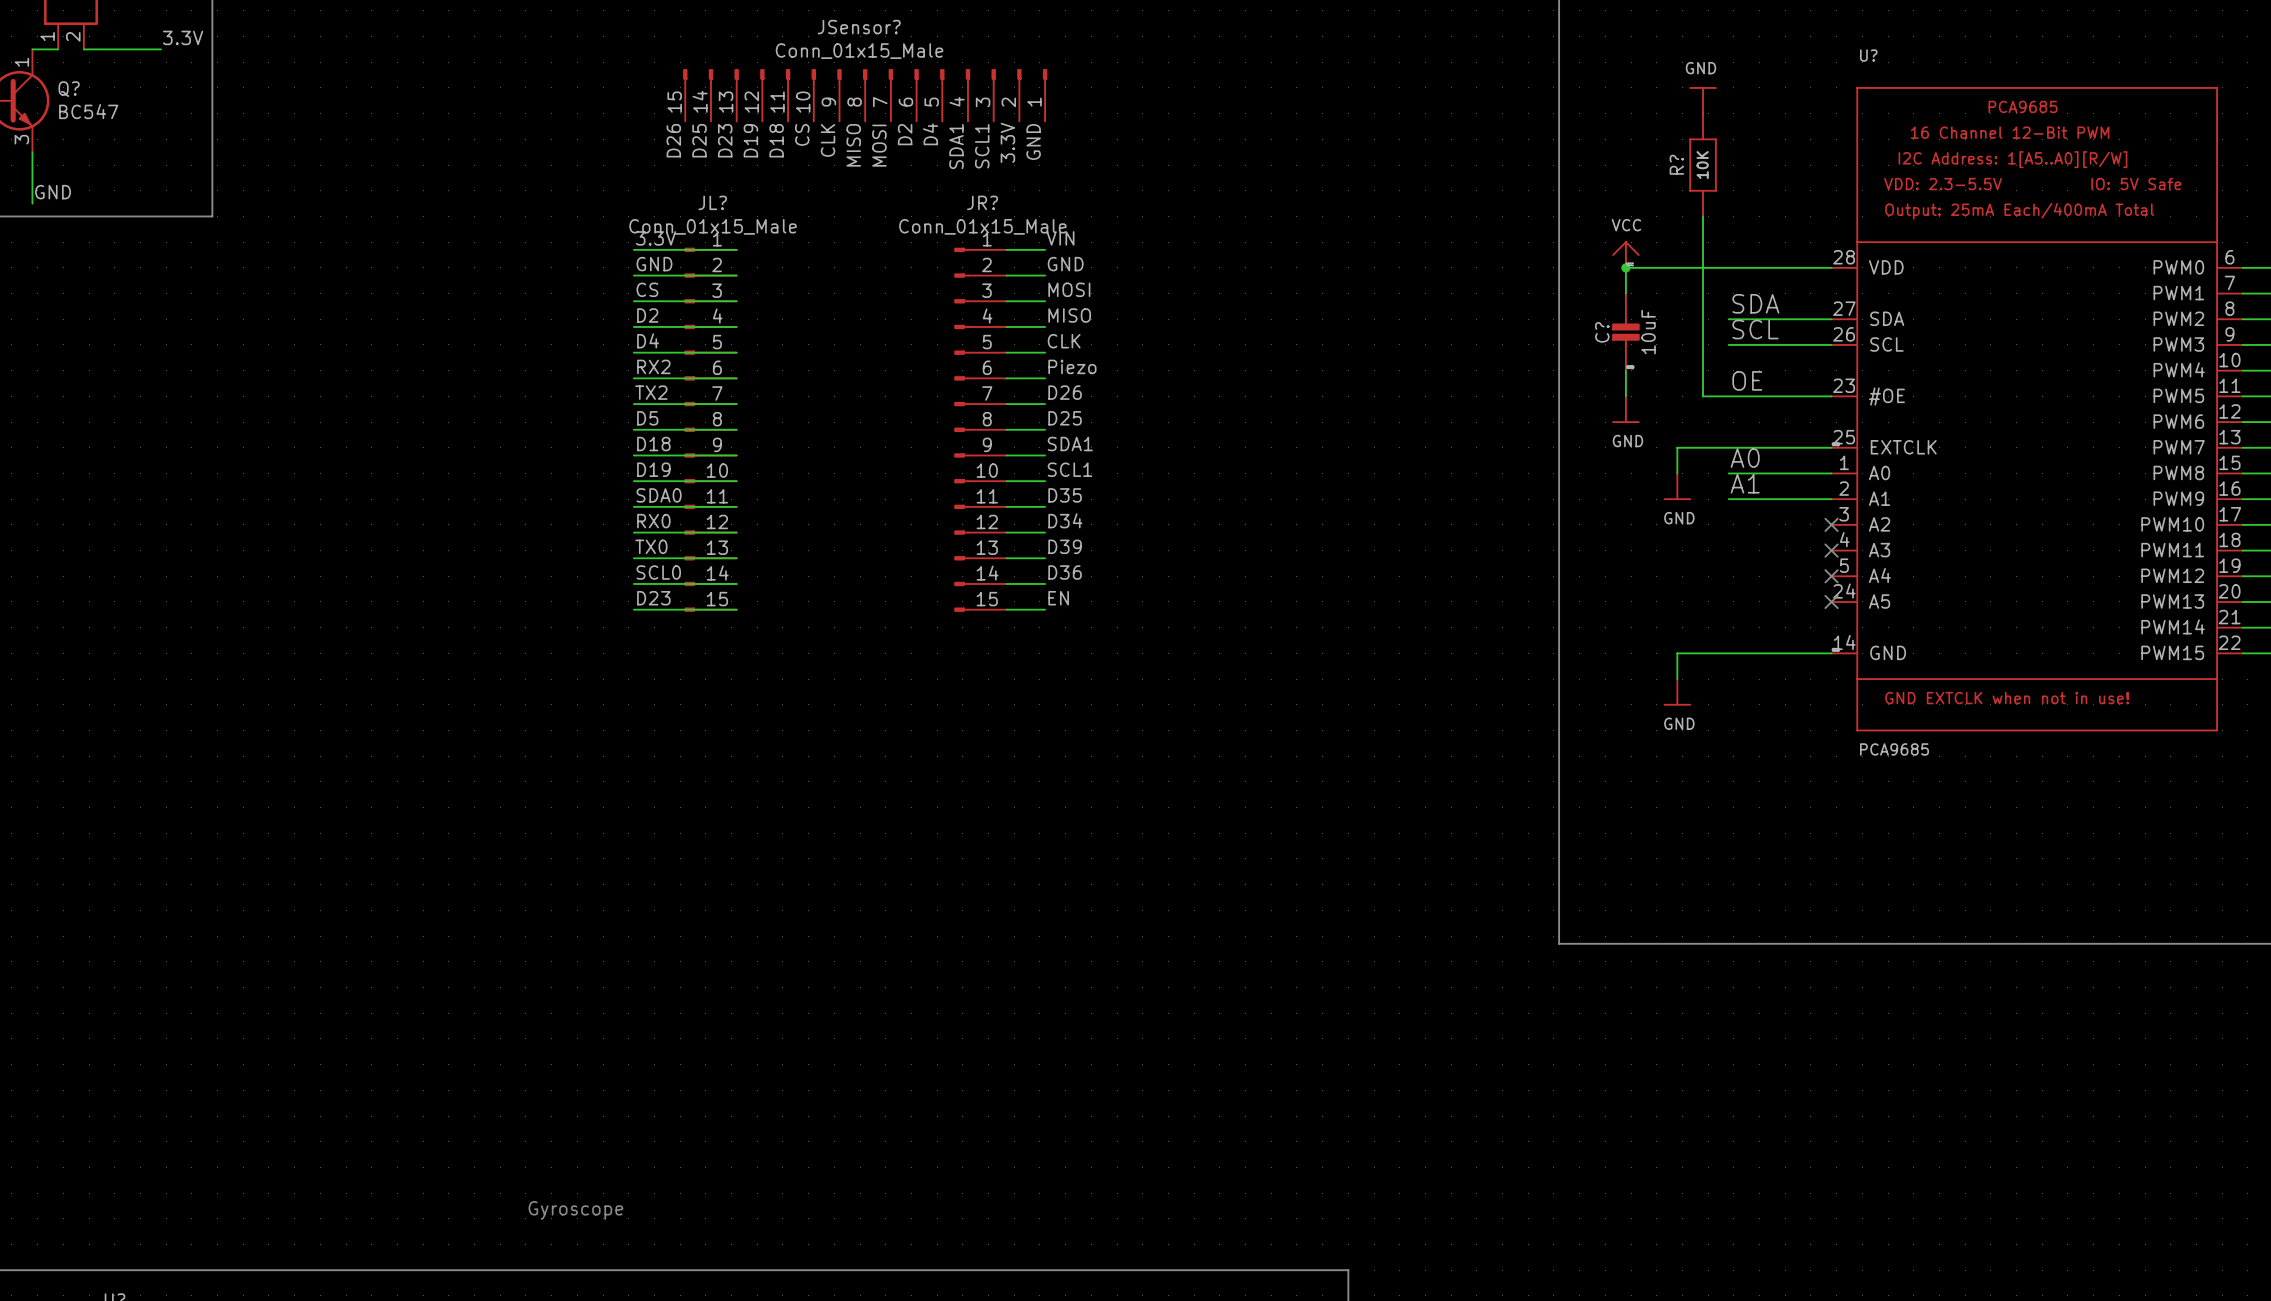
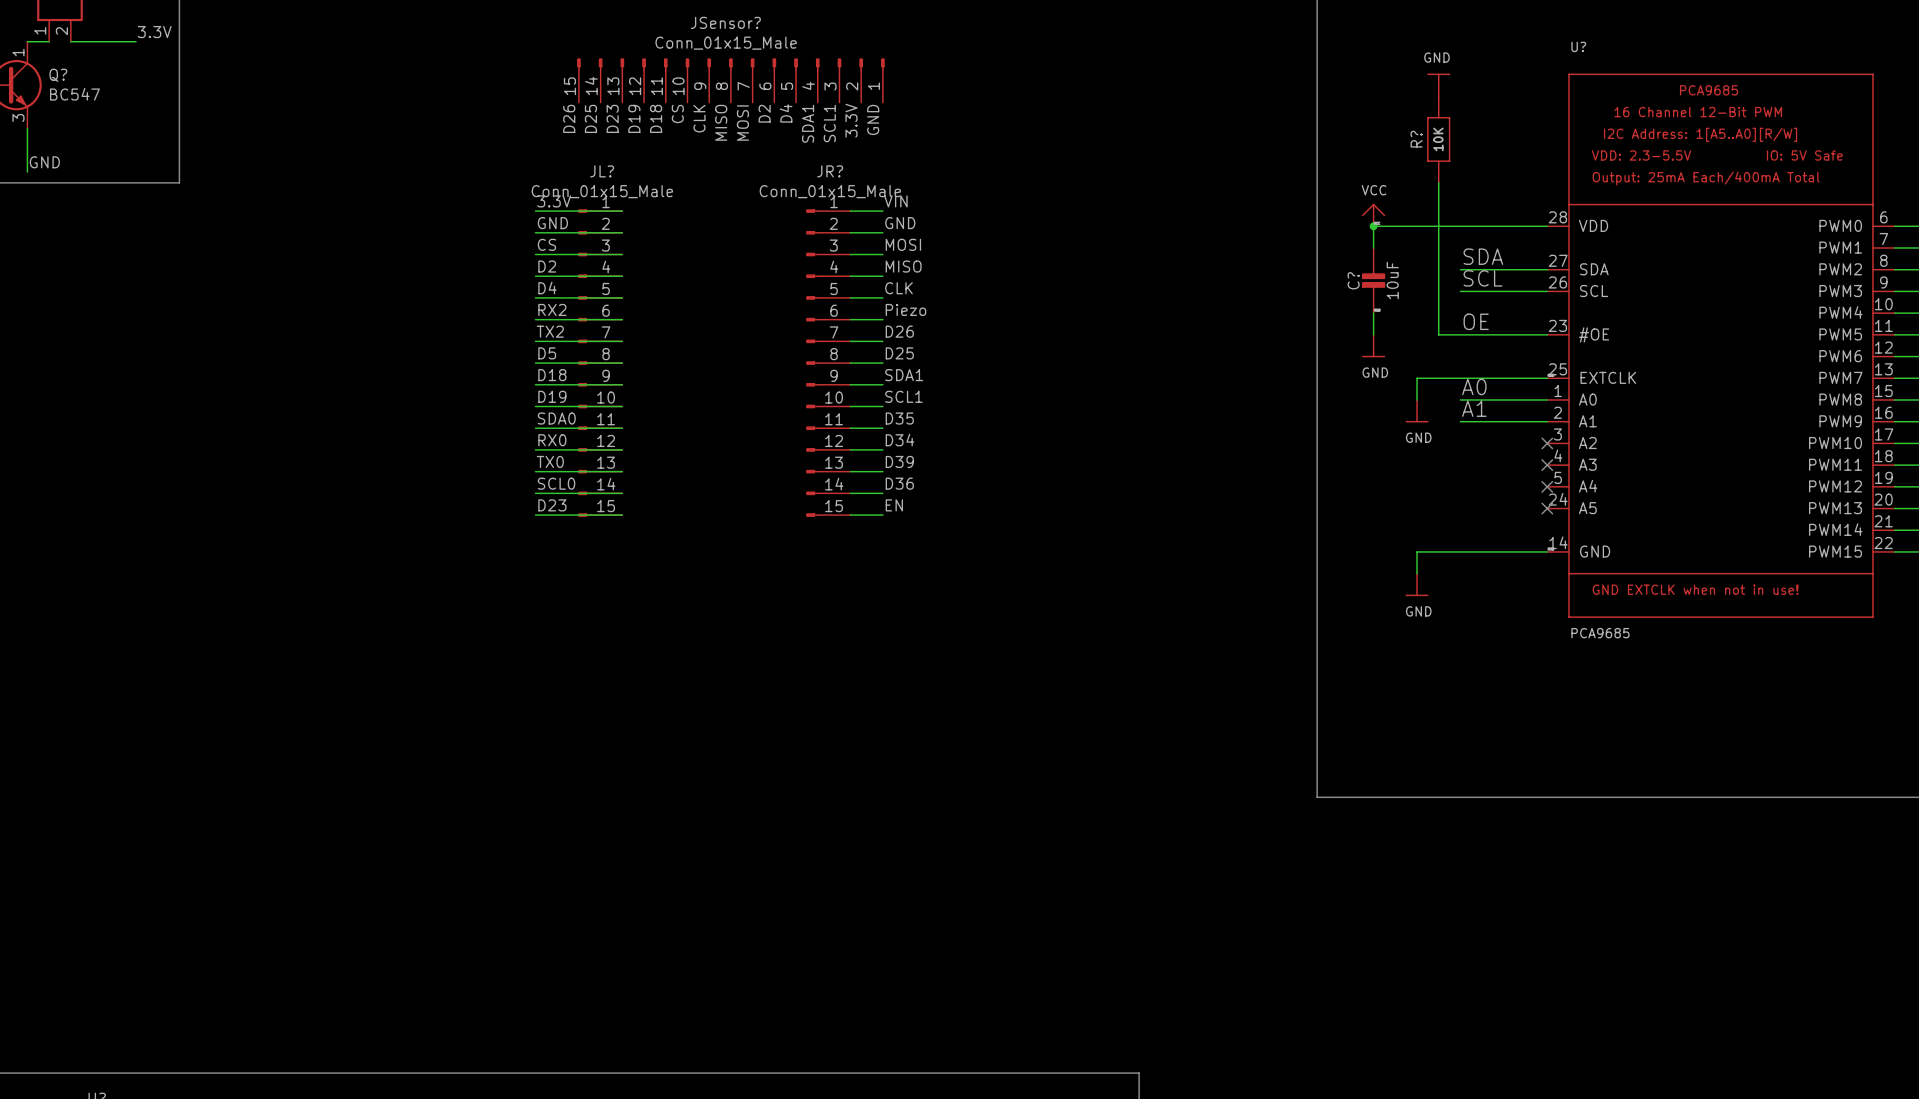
text: Gyroscope (575, 1210) -> none

